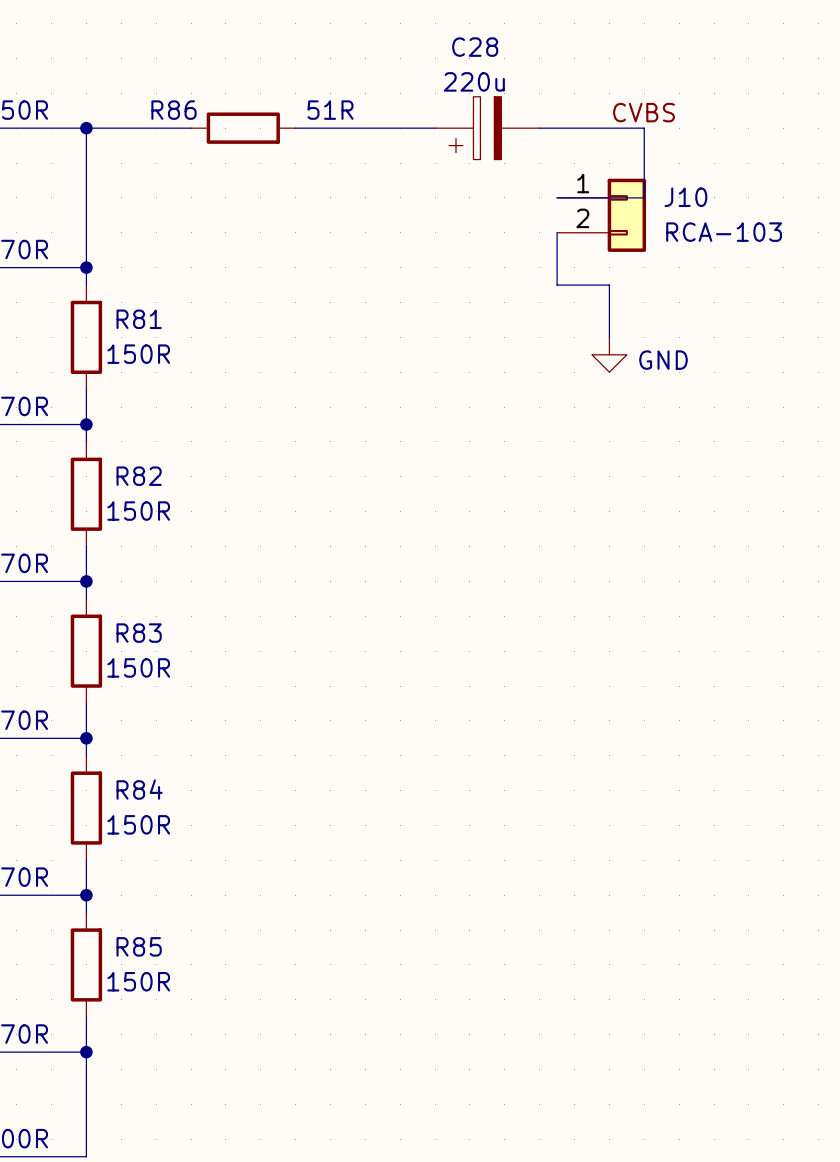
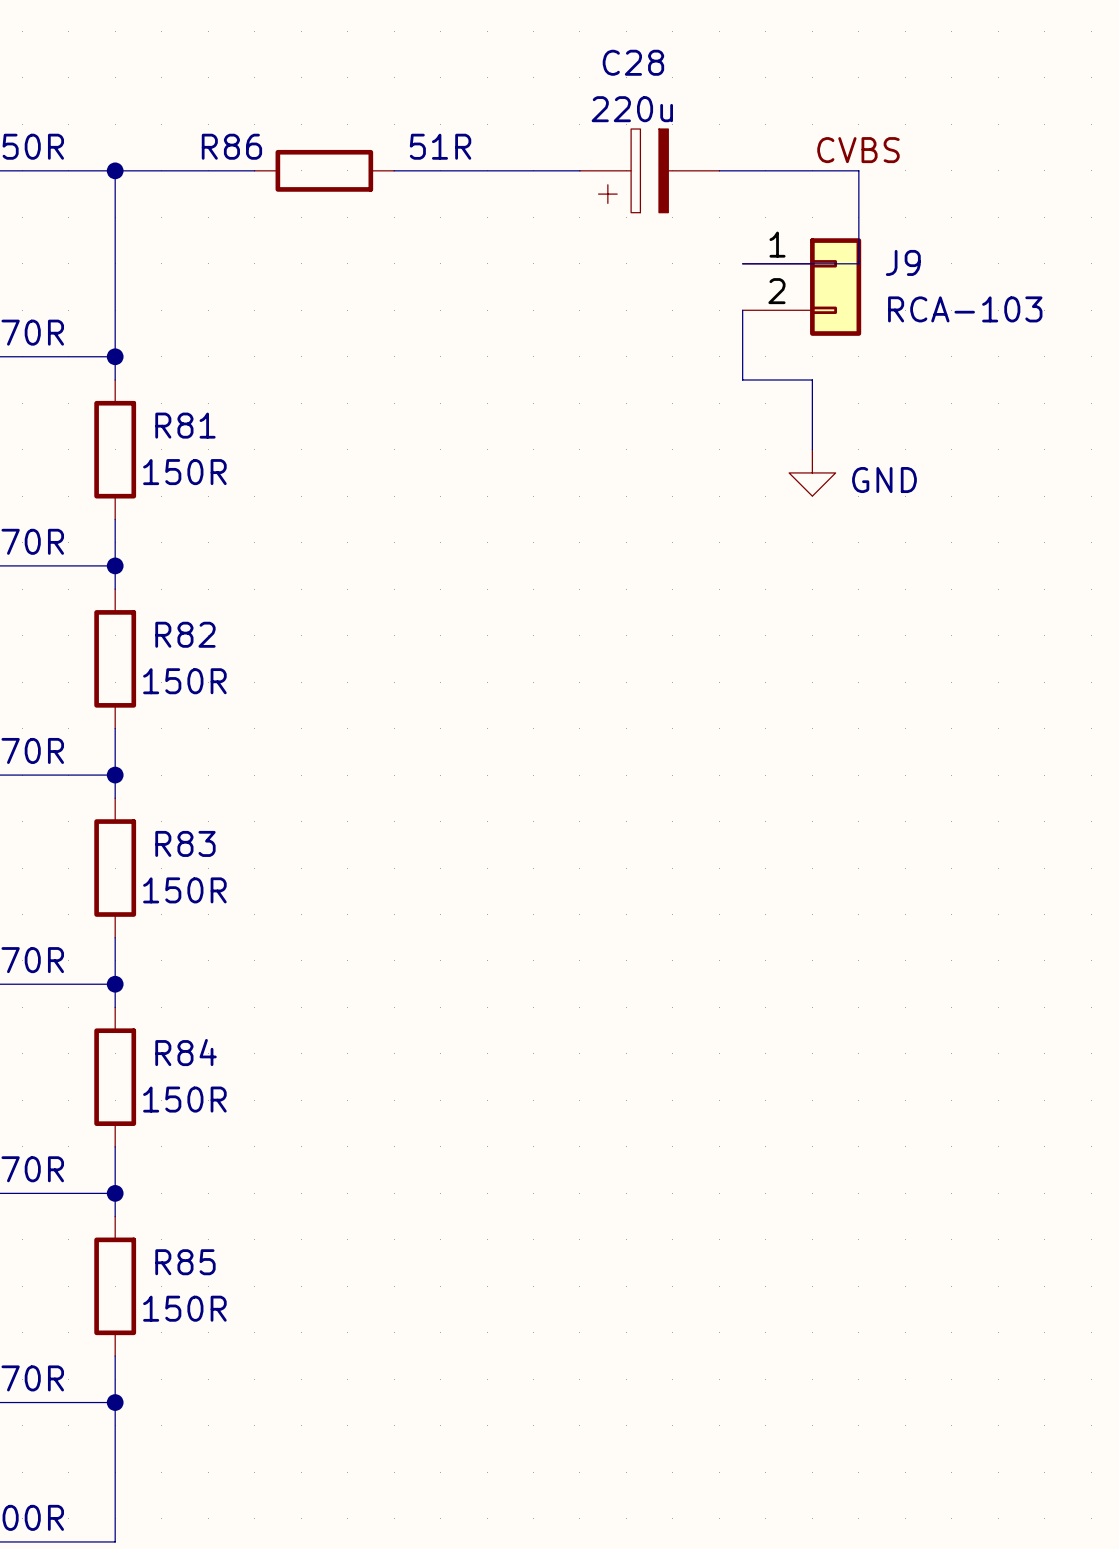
J10 name: J10 (685, 197) -> J9 (903, 262)

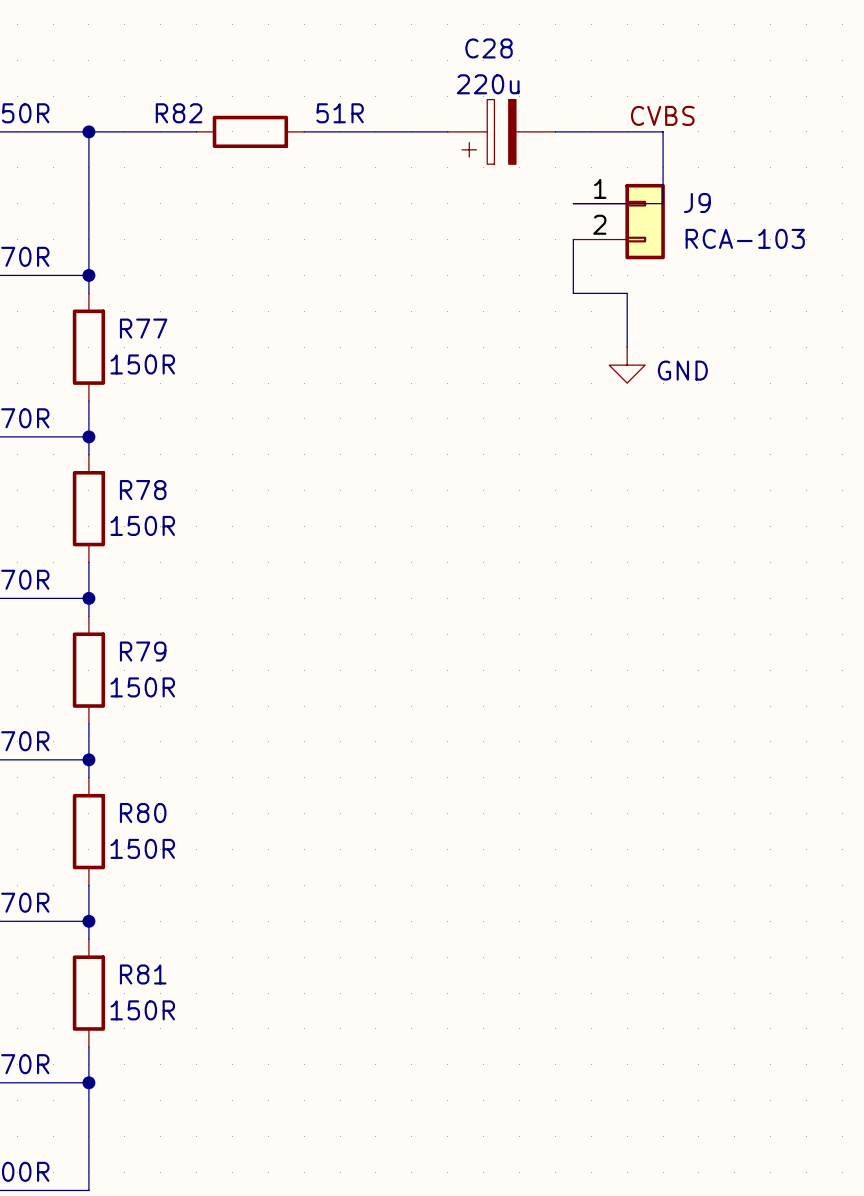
R86 name: R86 (231, 146) -> R82 (179, 113)
R81 name: R81 (185, 425) -> R77 (143, 328)
R82 name: R82 (185, 634) -> R78 (143, 490)
R83 name: R83 (185, 843) -> R79 (143, 651)
R84 name: R84 (186, 1052) -> R80 (143, 813)
R85 name: R85 (185, 1262) -> R81 (143, 974)

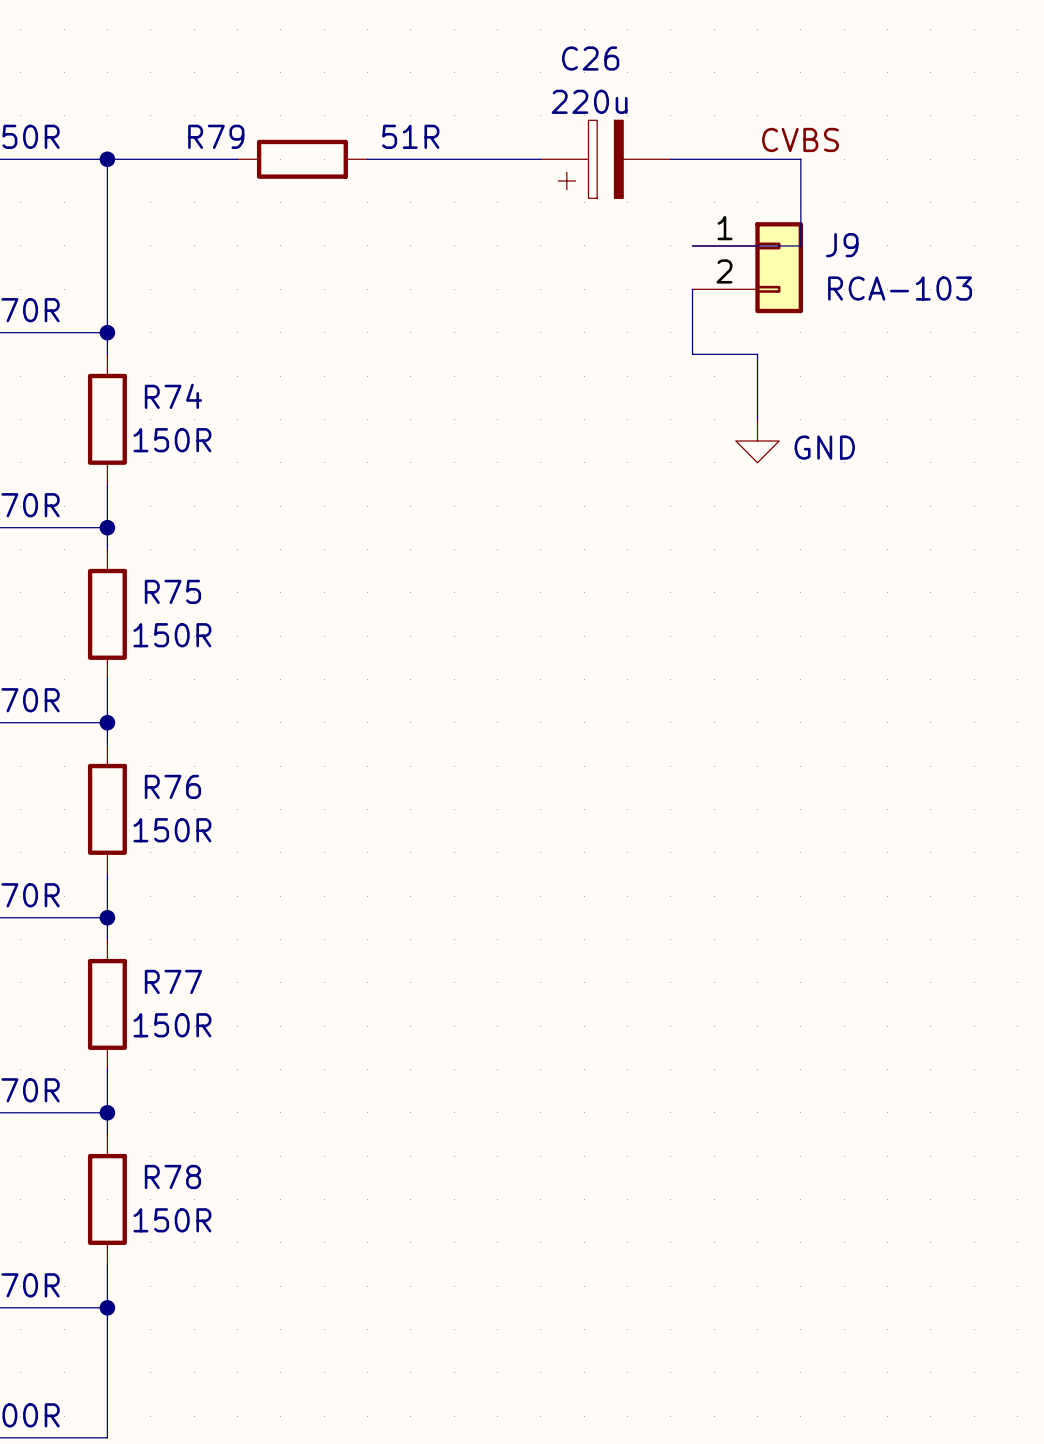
C28 name: C28 (489, 48) -> C26 (590, 58)
R82 name: R82 (179, 113) -> R79 (216, 136)
R77 name: R77 (143, 328) -> R74 (173, 396)
R78 name: R78 (143, 490) -> R75 (172, 591)
R79 name: R79 (143, 651) -> R76 (172, 786)
R80 name: R80 (143, 813) -> R77 (173, 981)
R81 name: R81 (143, 974) -> R78 (172, 1176)

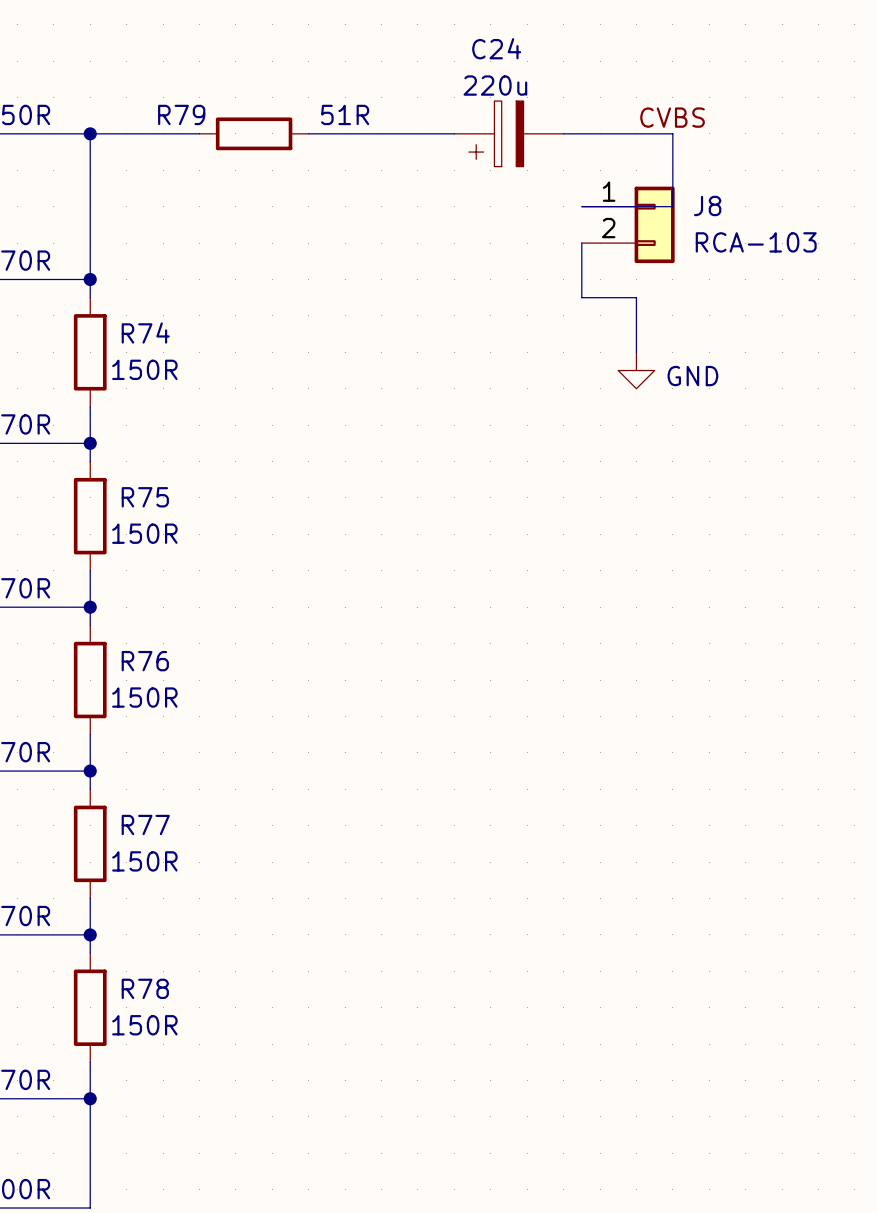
C26 name: C26 (590, 58) -> C24 (496, 48)
J9 name: J9 (842, 245) -> J8 (707, 205)

